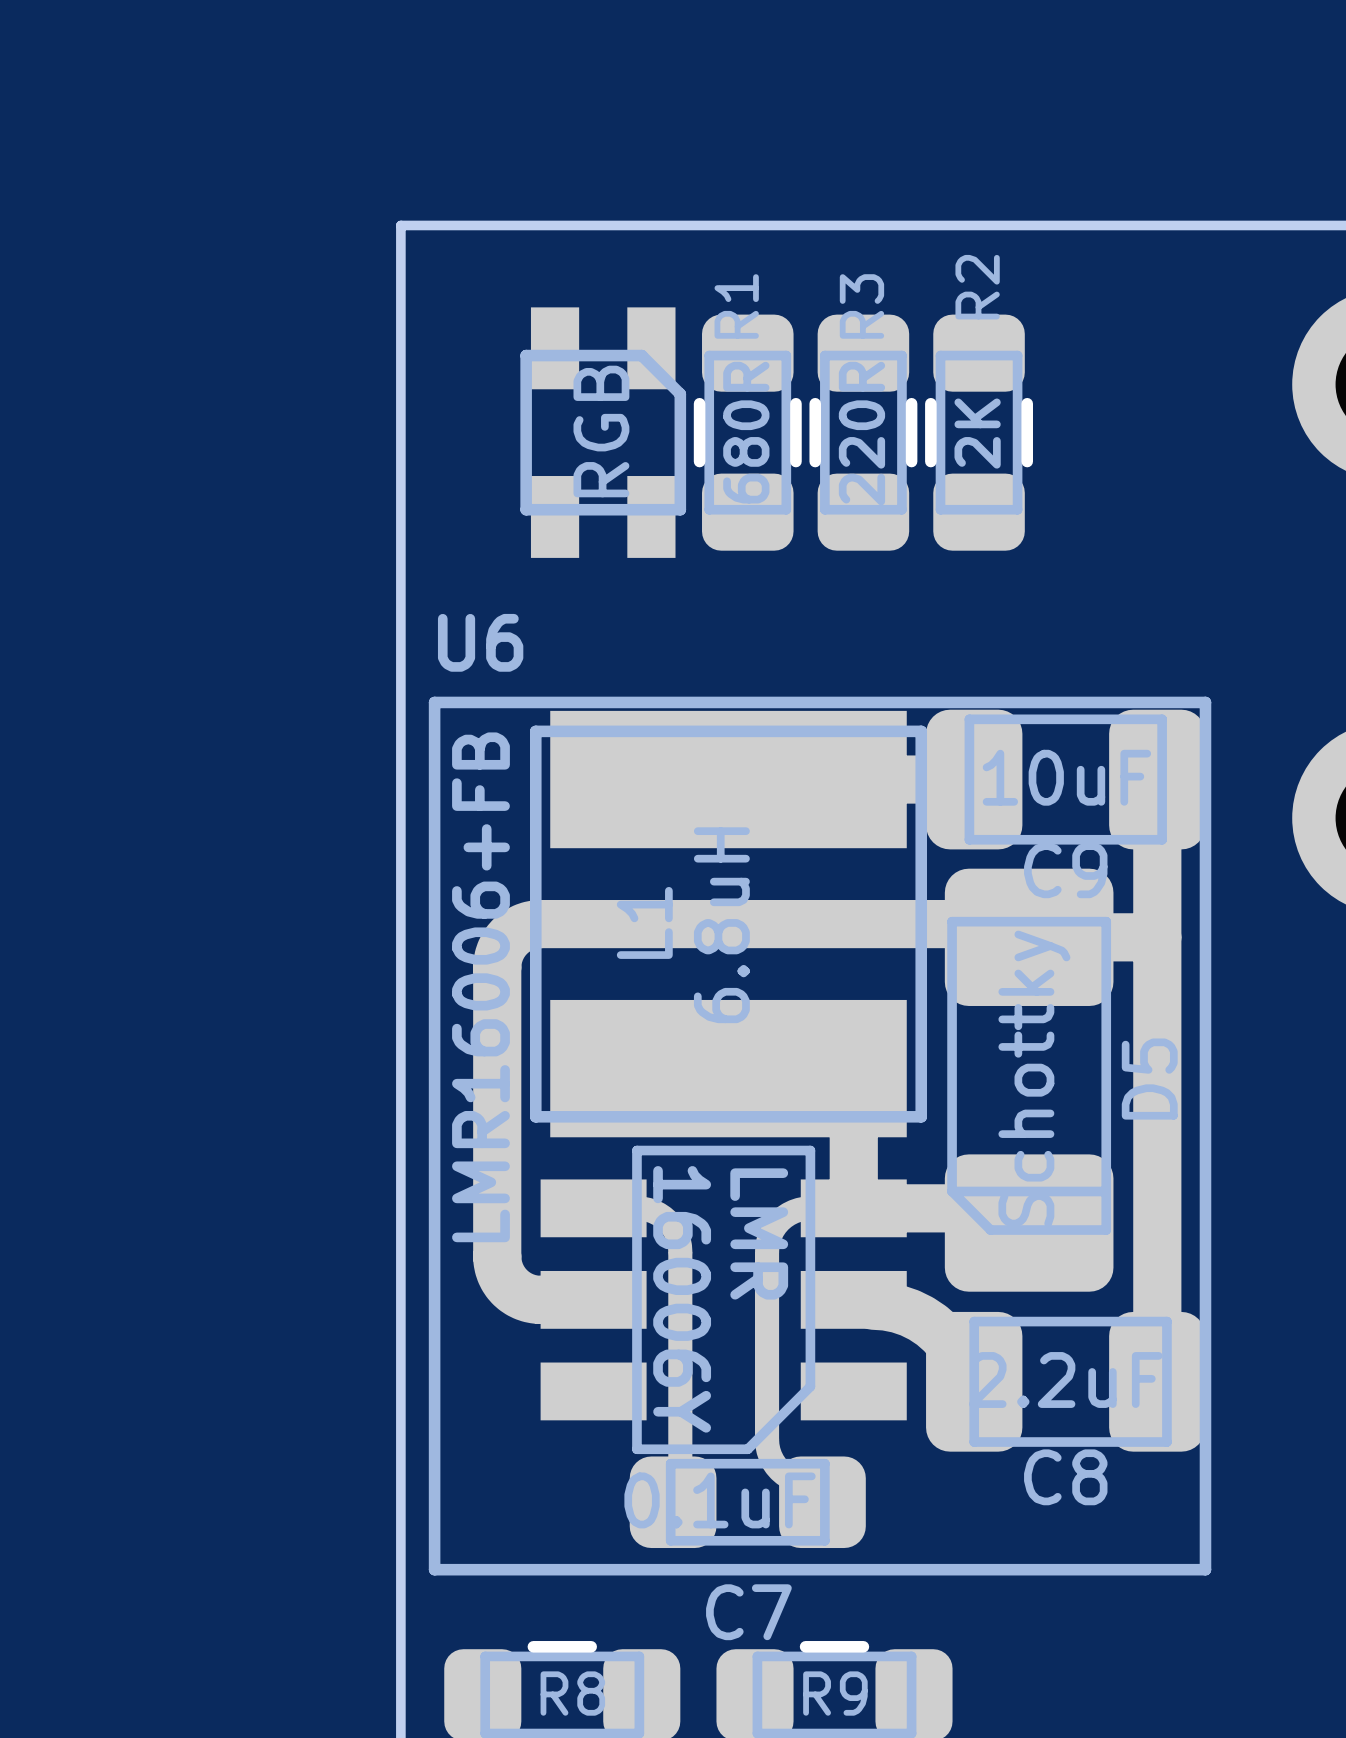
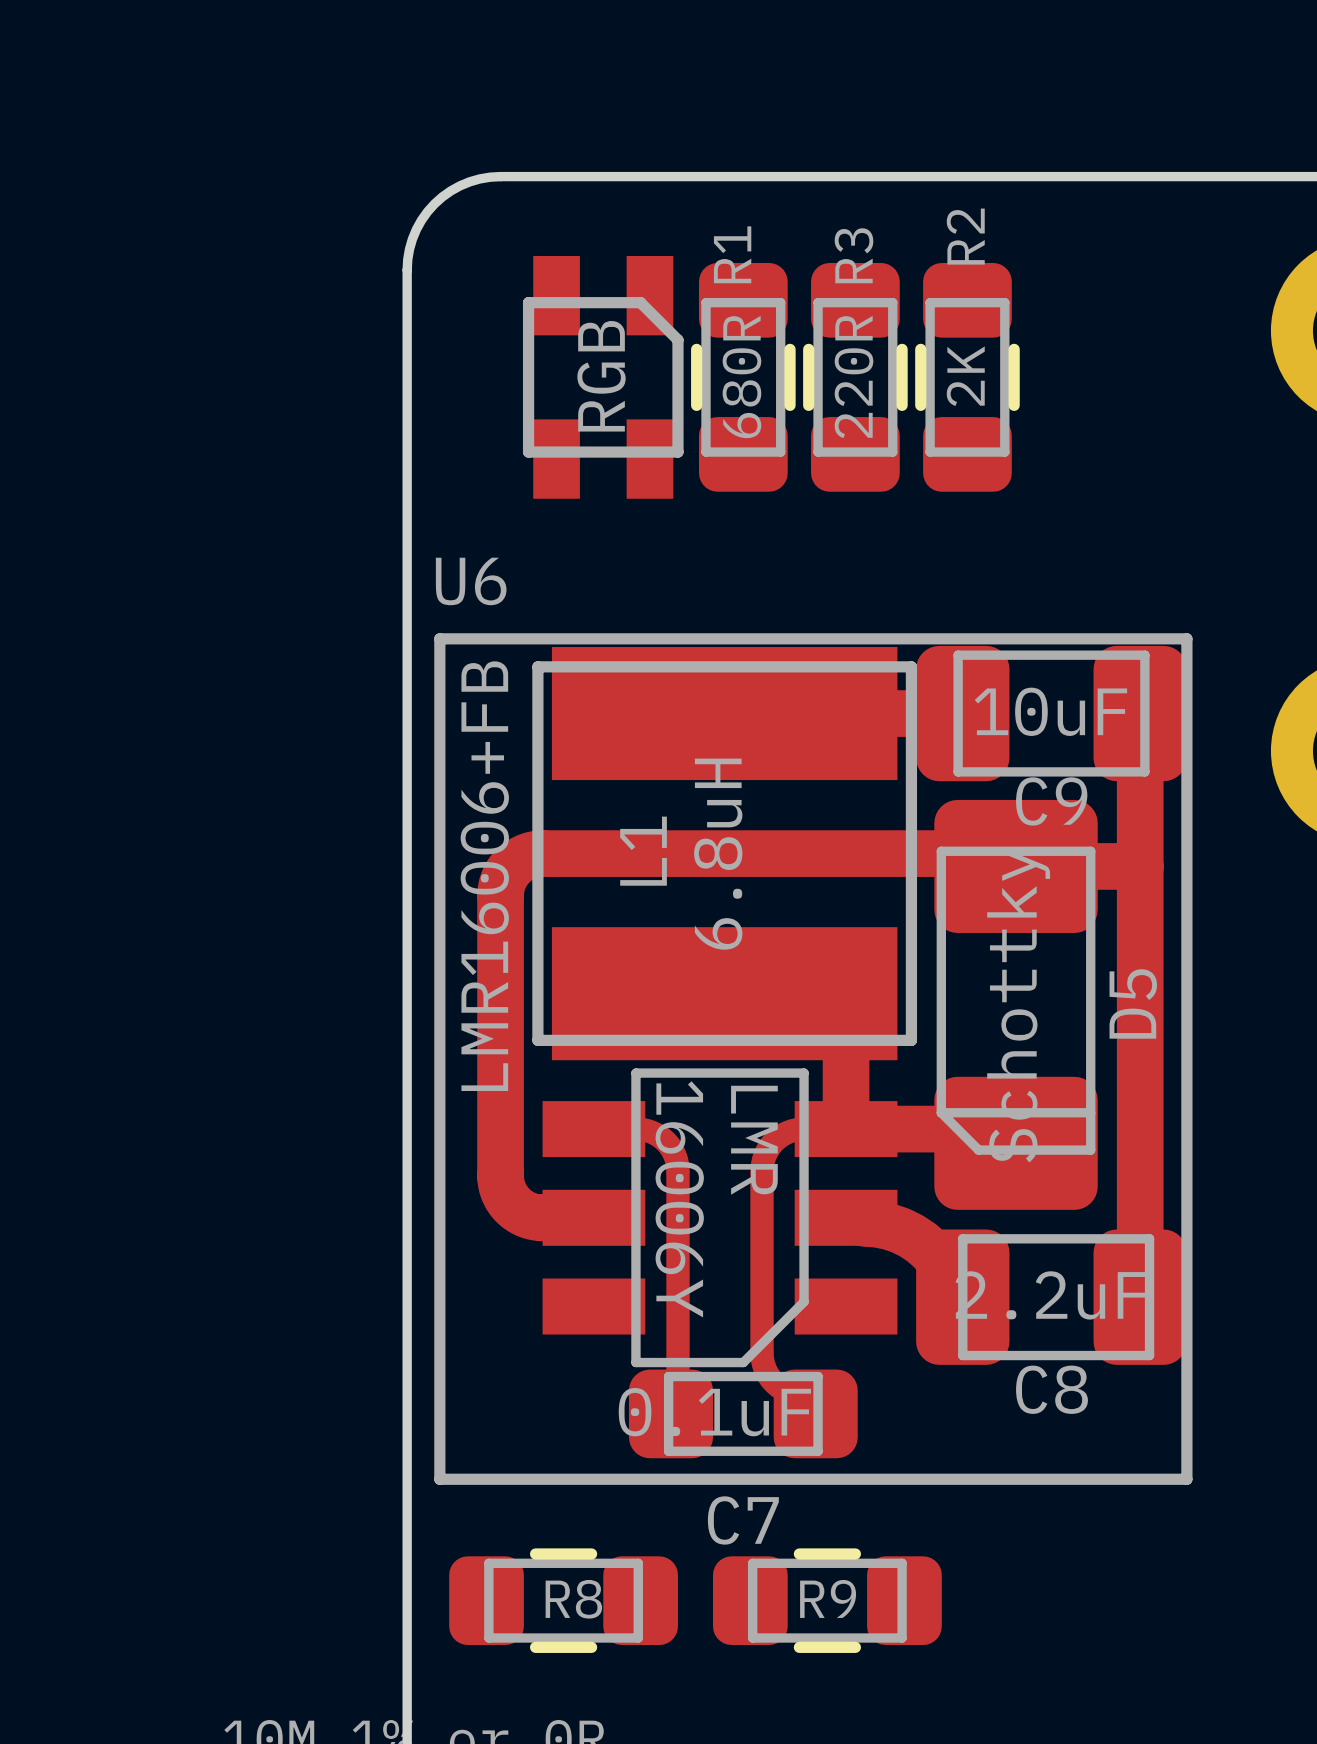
board edge: (497, 225) (400, 225) (400, 321) -> (500, 176) (479, 178) (460, 185) (434, 203) (421, 220) (412, 239) (407, 269)

